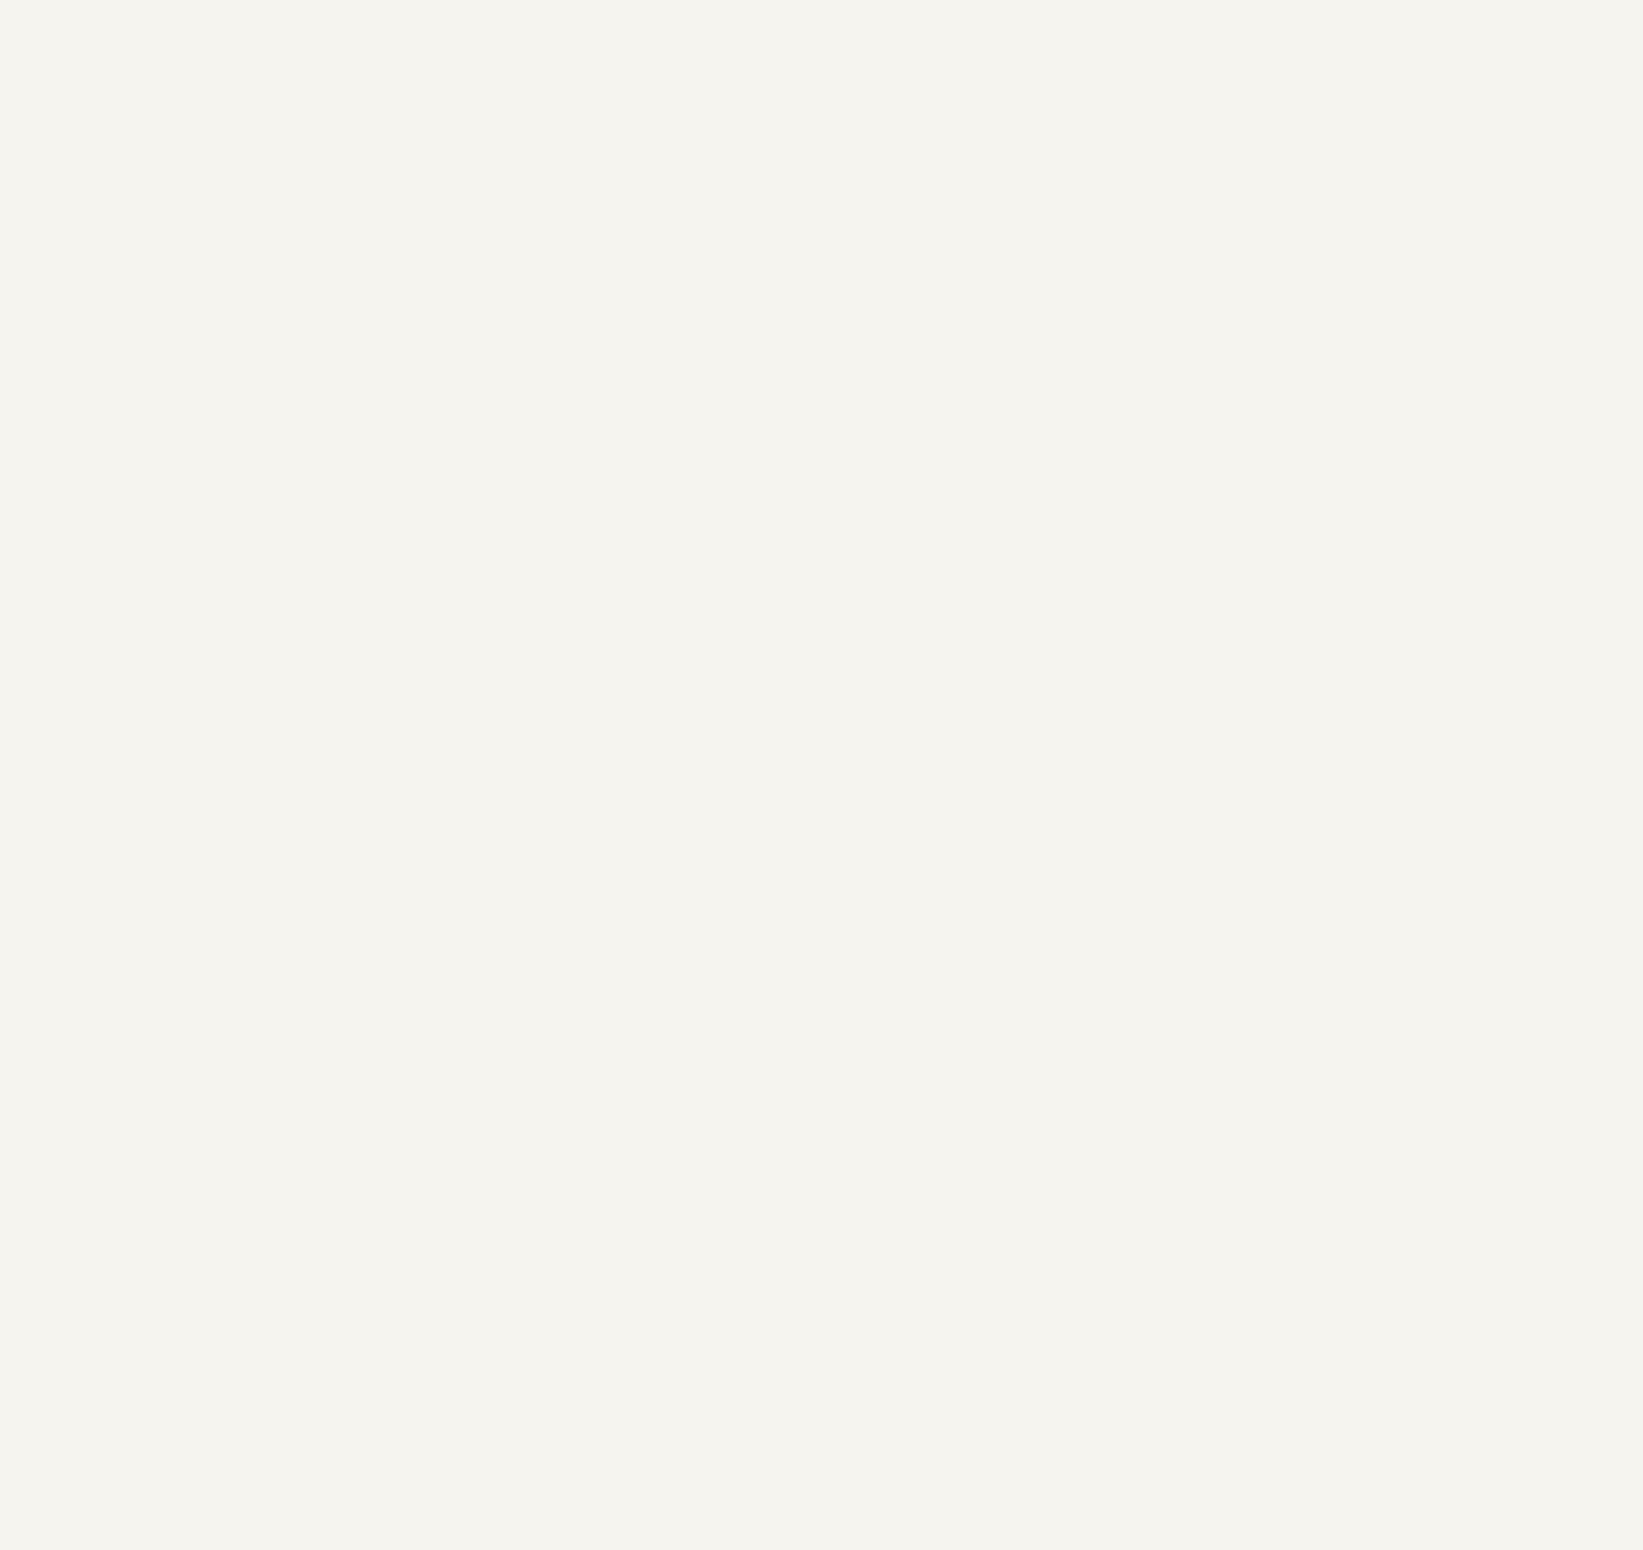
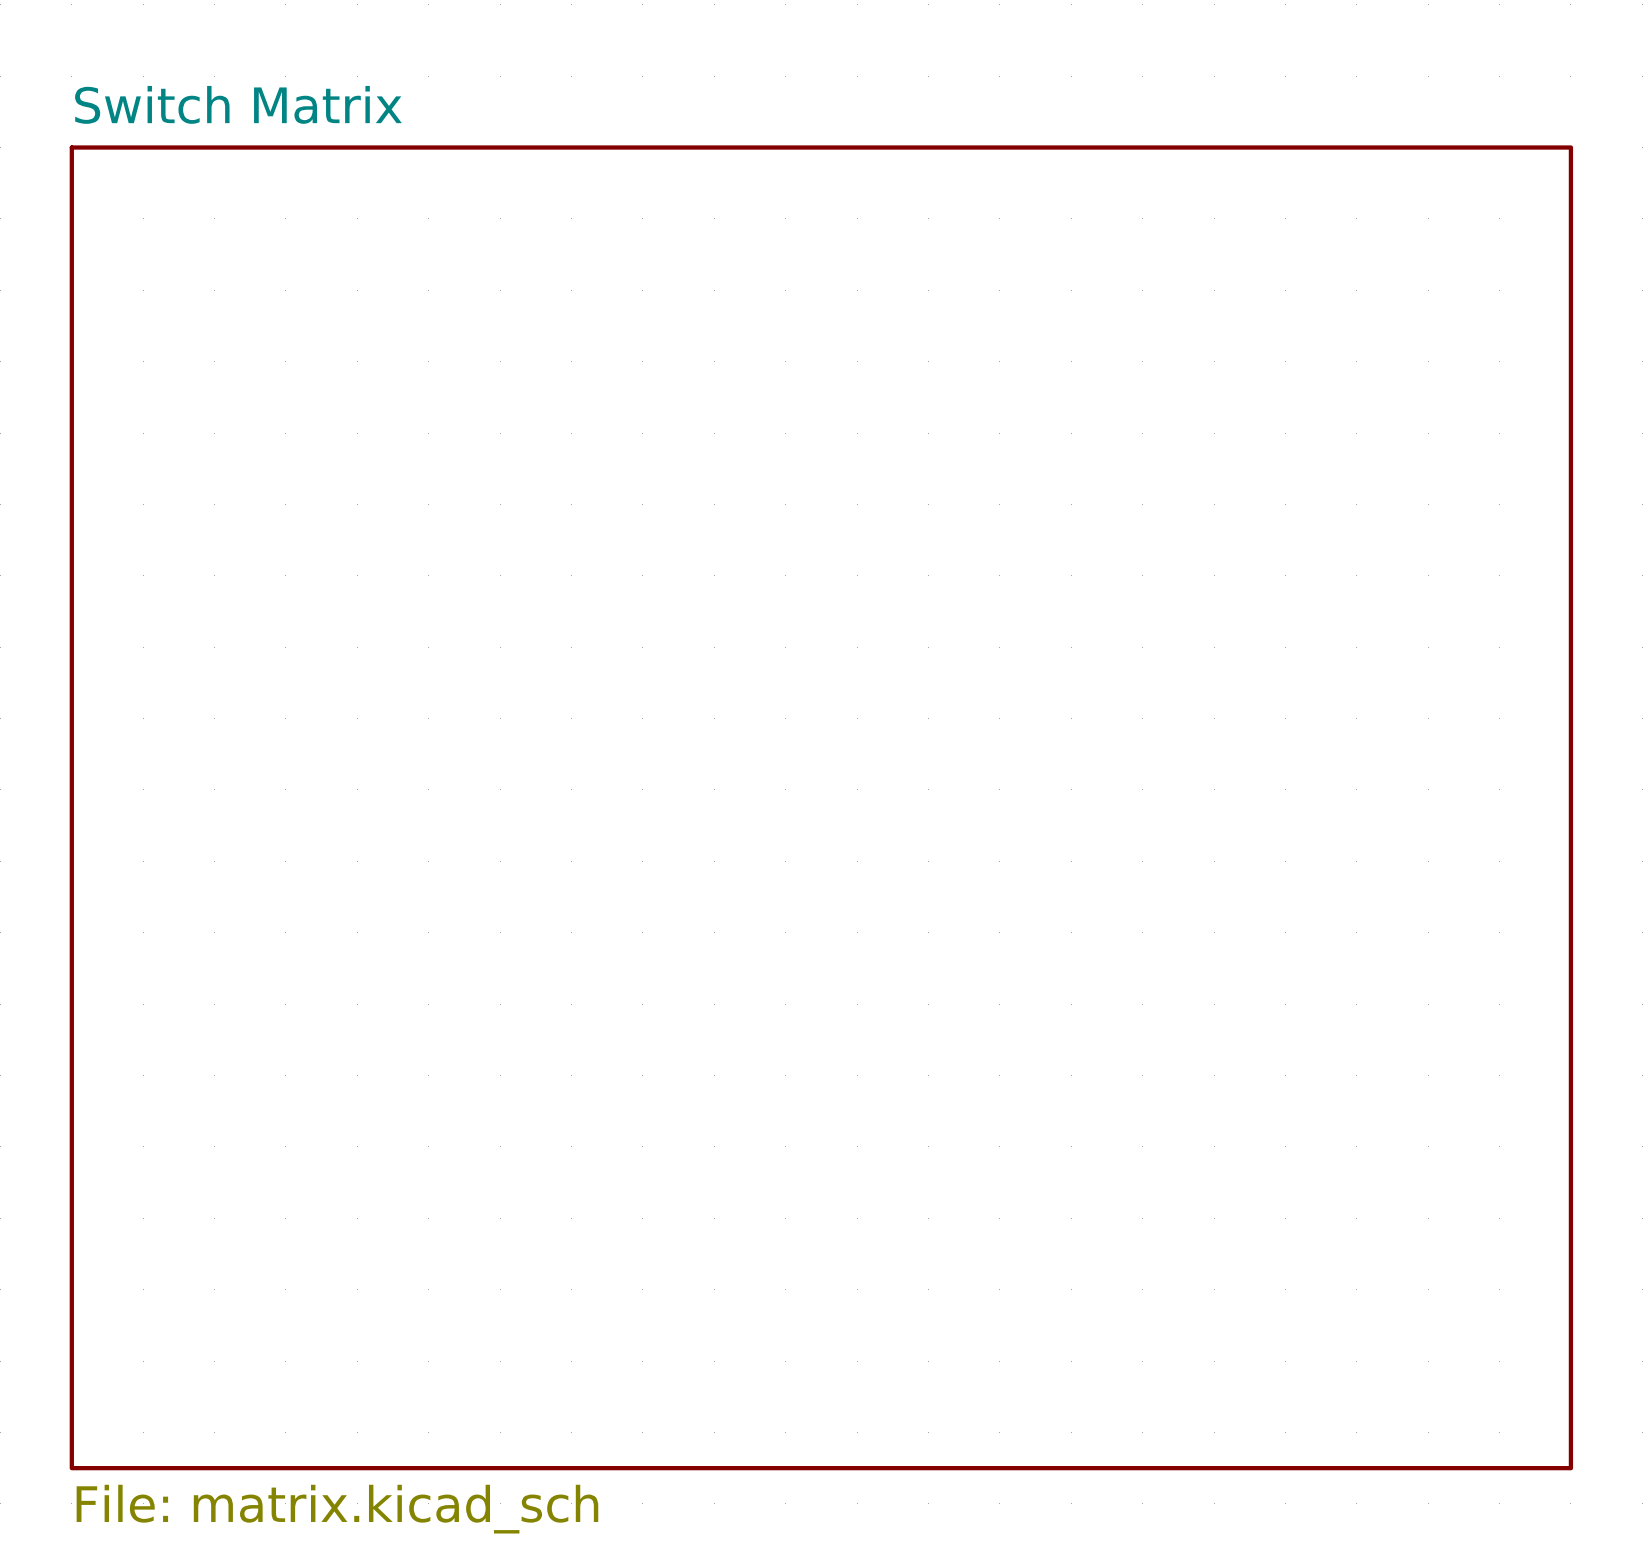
sheet Switch Matrix: none -> File: matrix.kicad_sch (821, 807)

